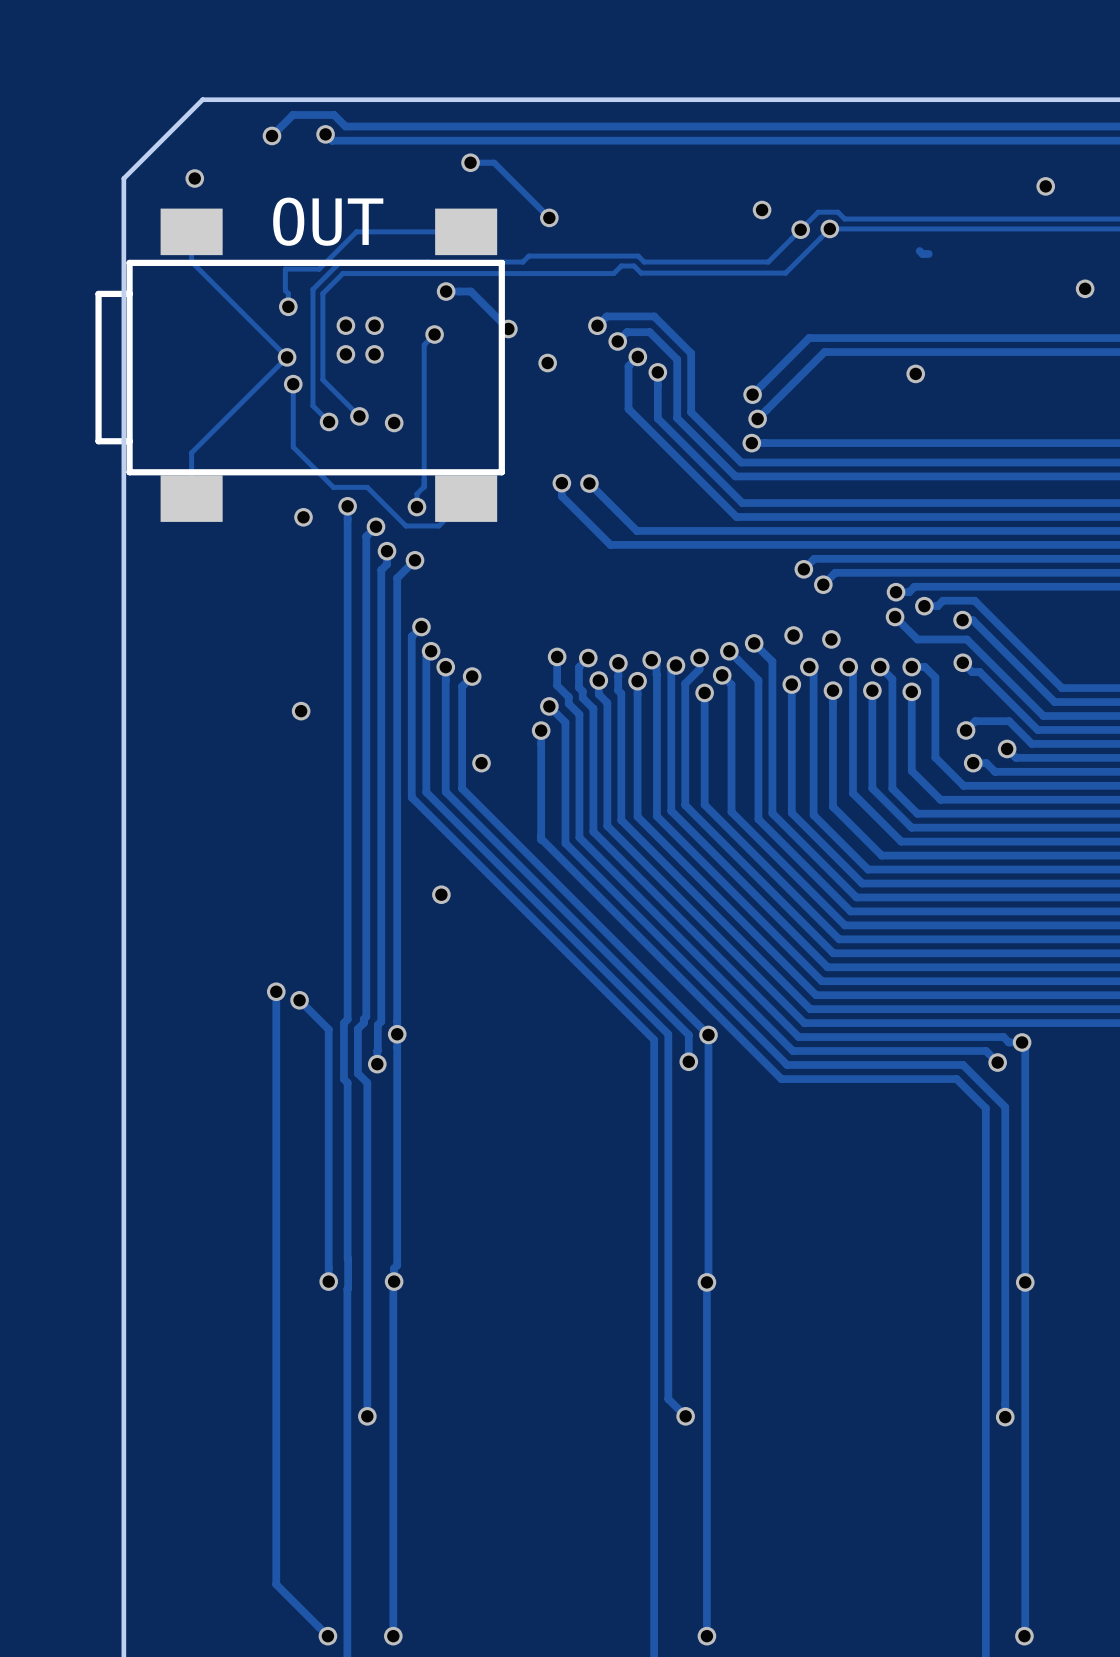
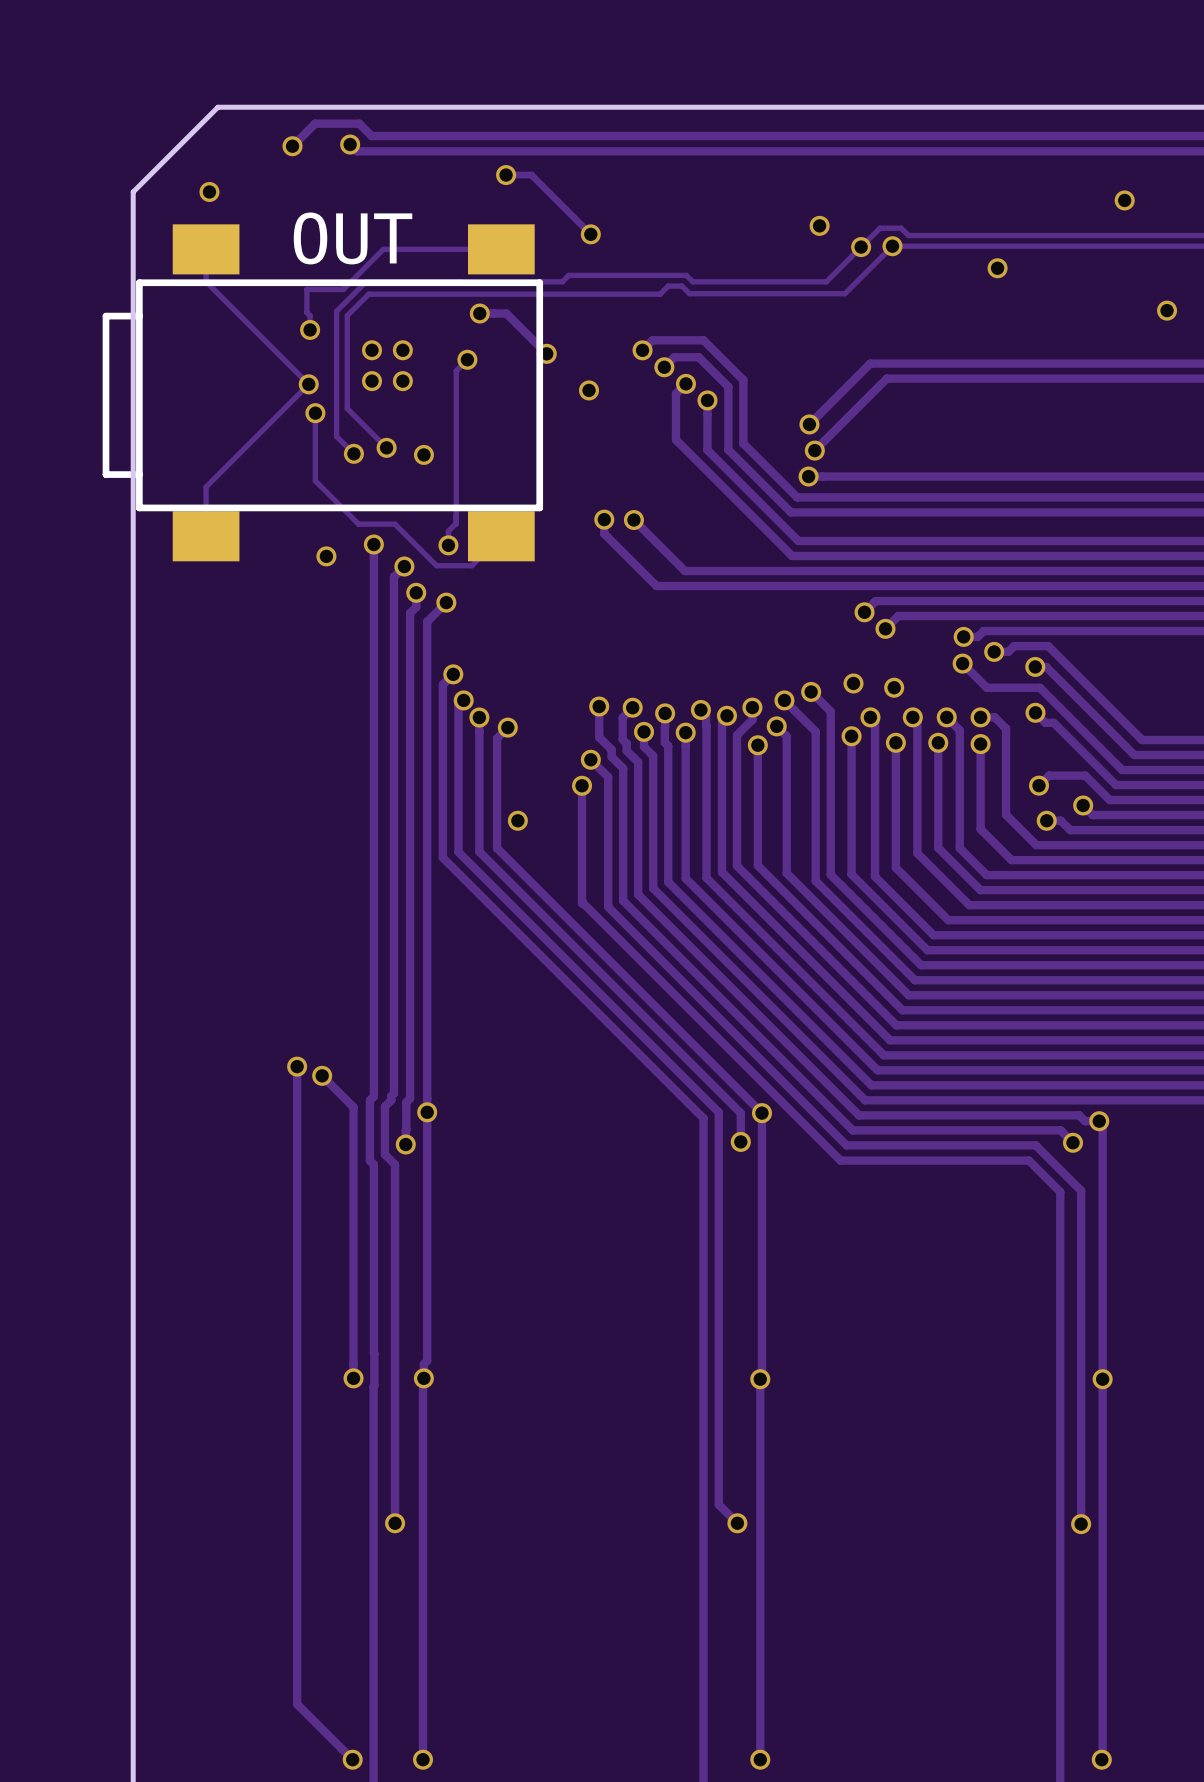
track: (919, 250) (922, 253) (928, 253) -> none
via position: (915, 373) -> (997, 268)
via: (301, 711) -> none
via: (441, 894) -> none

